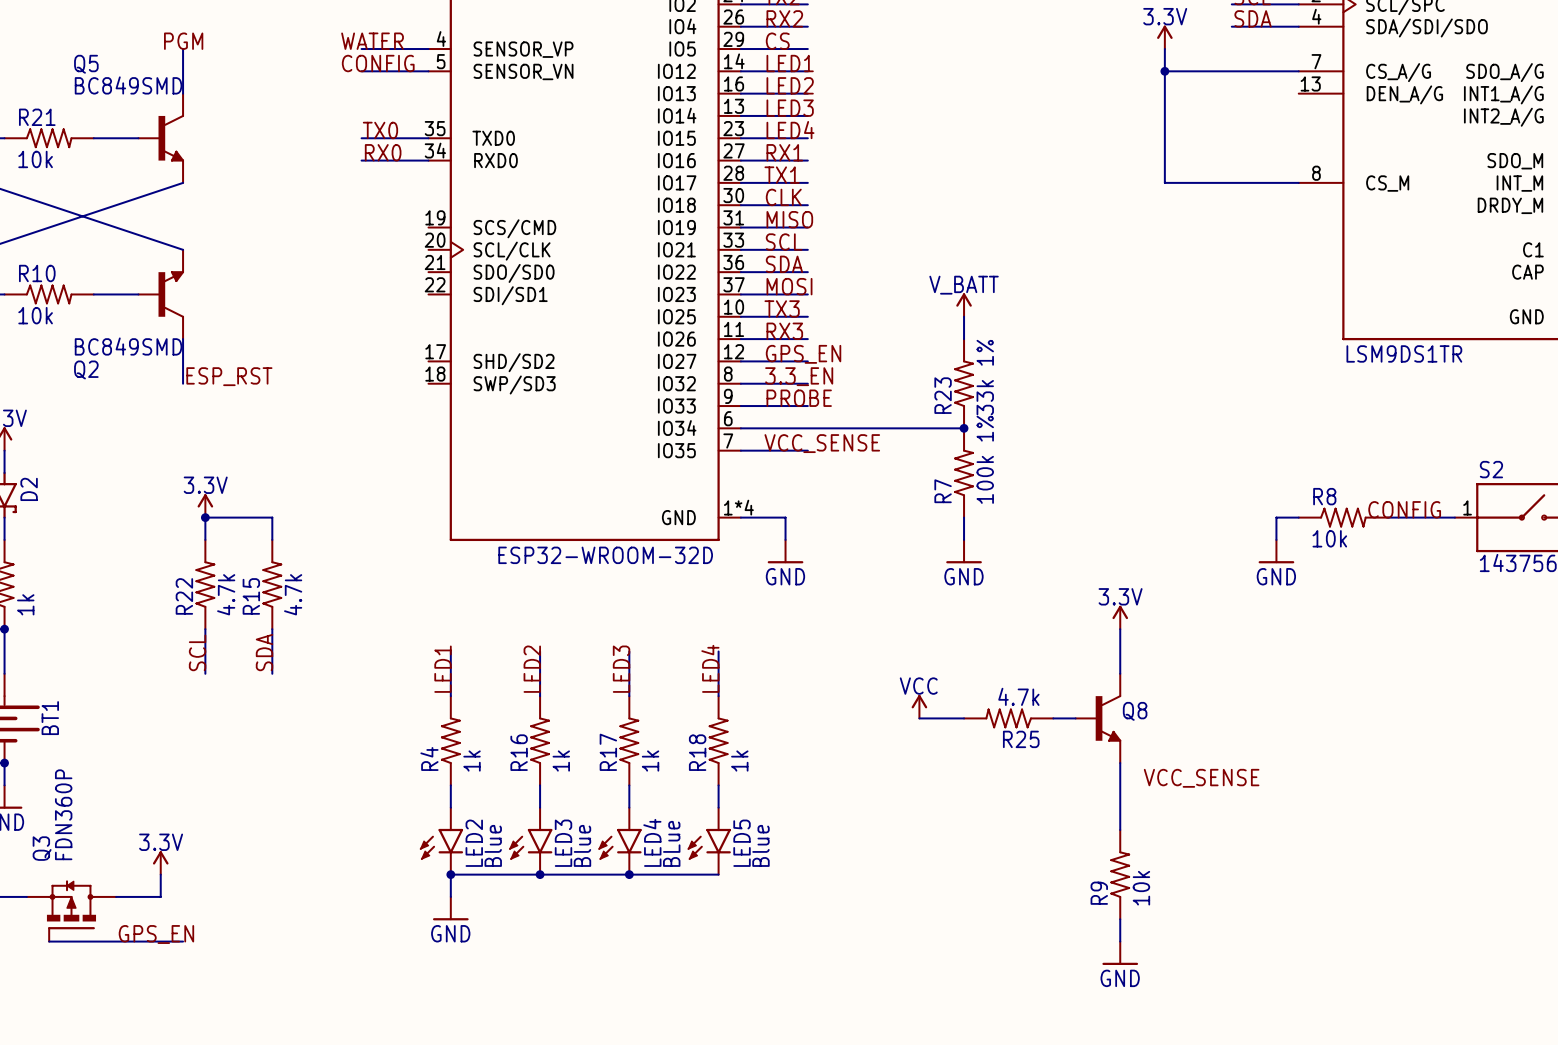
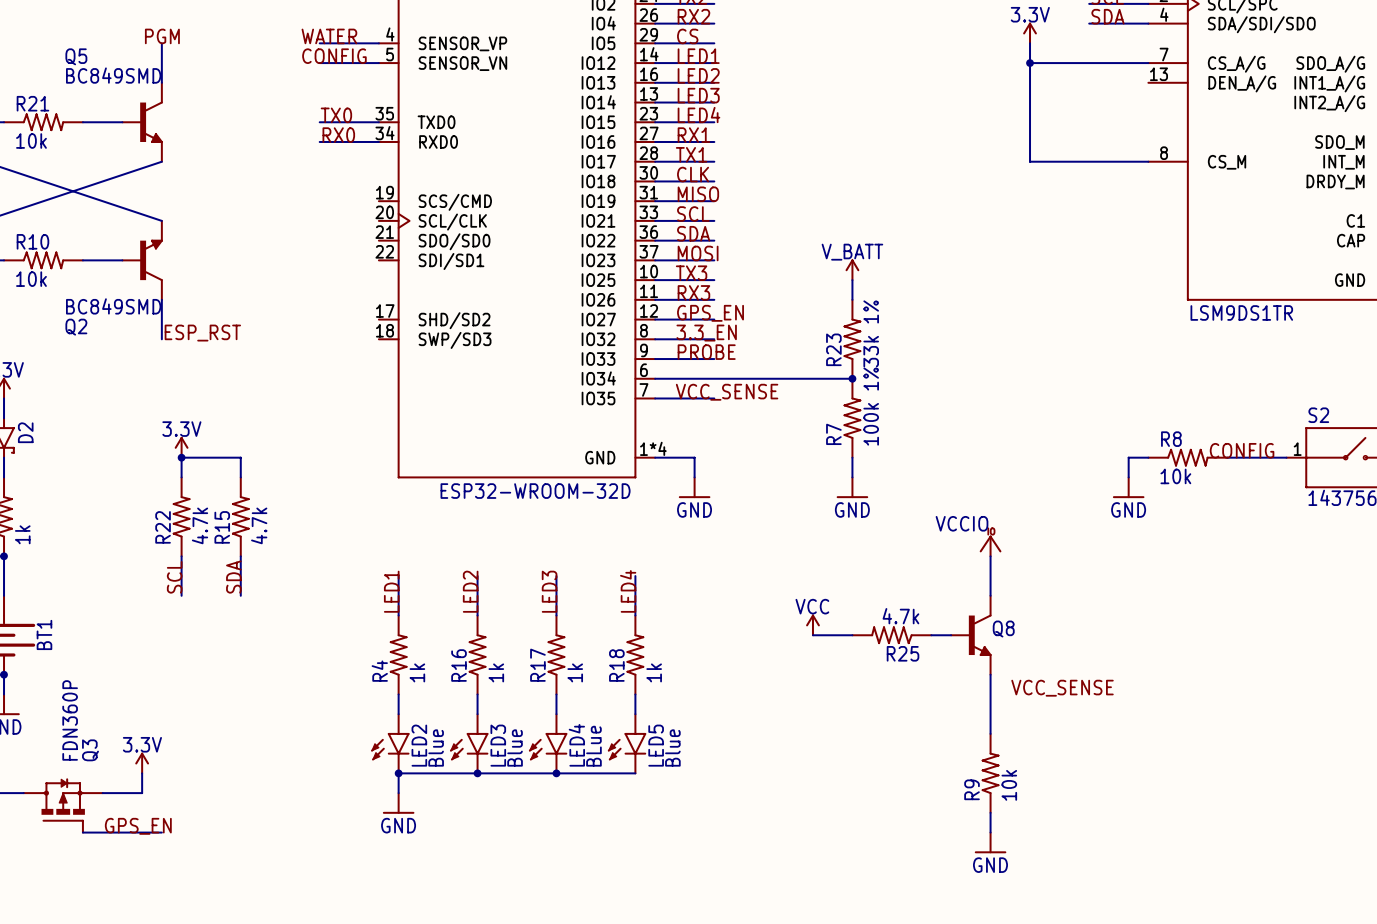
power symbol: 3.3V (1120, 617) -> VCCIO (990, 545)
Q3 flip: as is (71, 911) -> left-right (63, 805)
wire: (49, 941) (93, 941) -> none

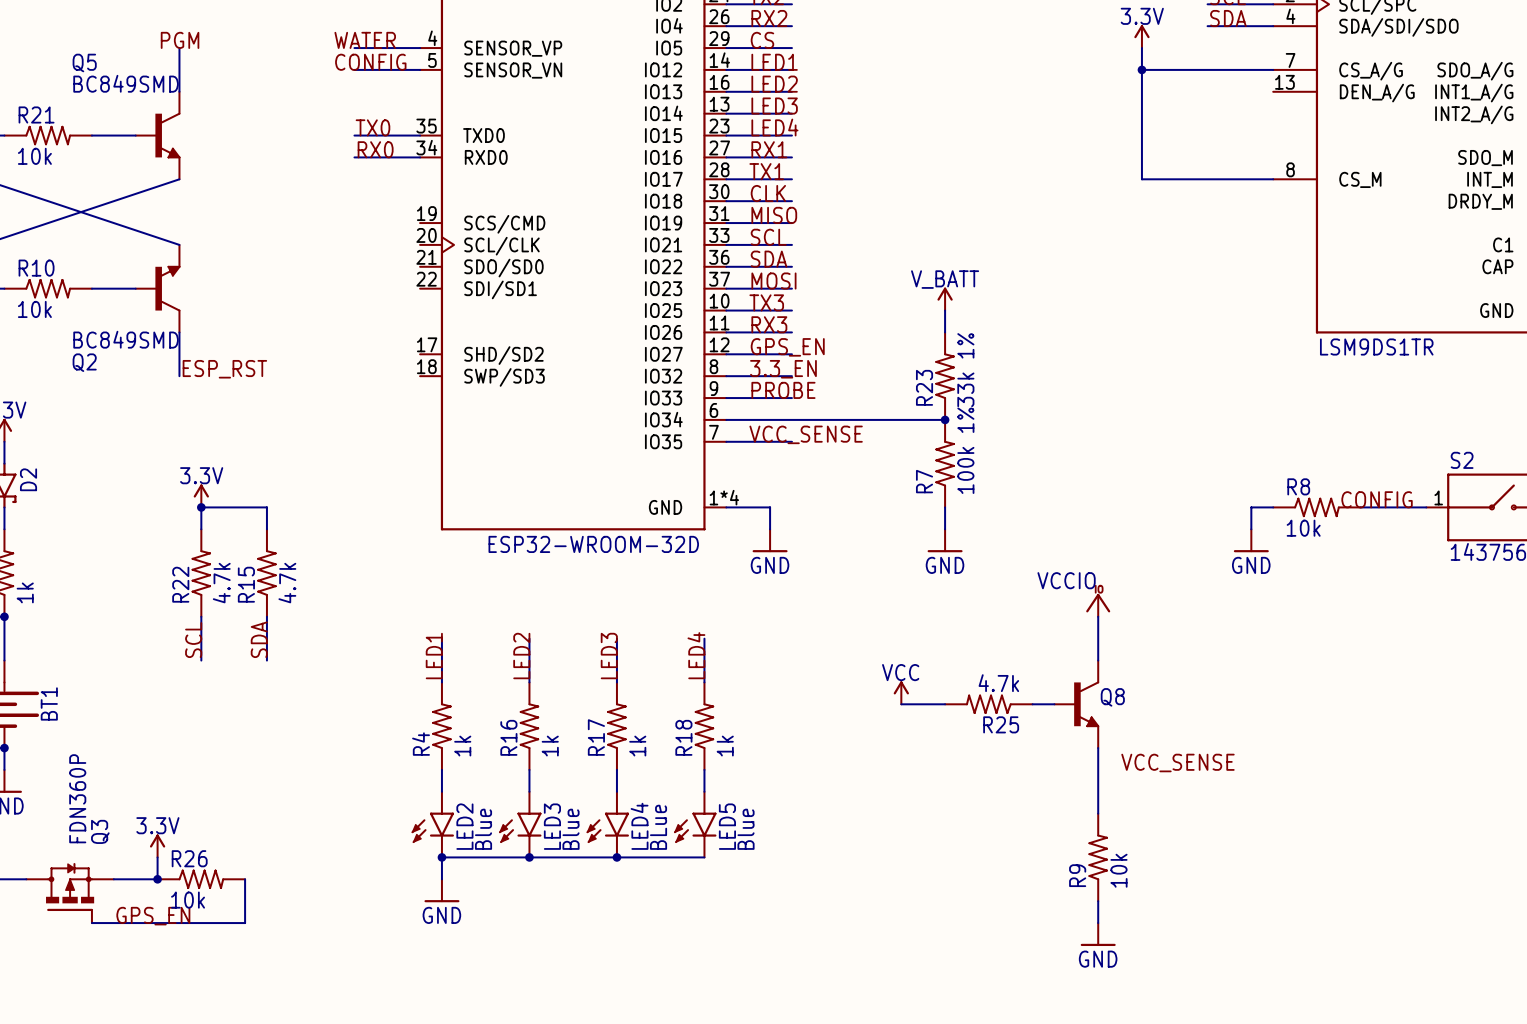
junction: none -> (157, 879)
R26: none -> 10k (201, 879)
wire: none -> (245, 879) (245, 923) (179, 923)

